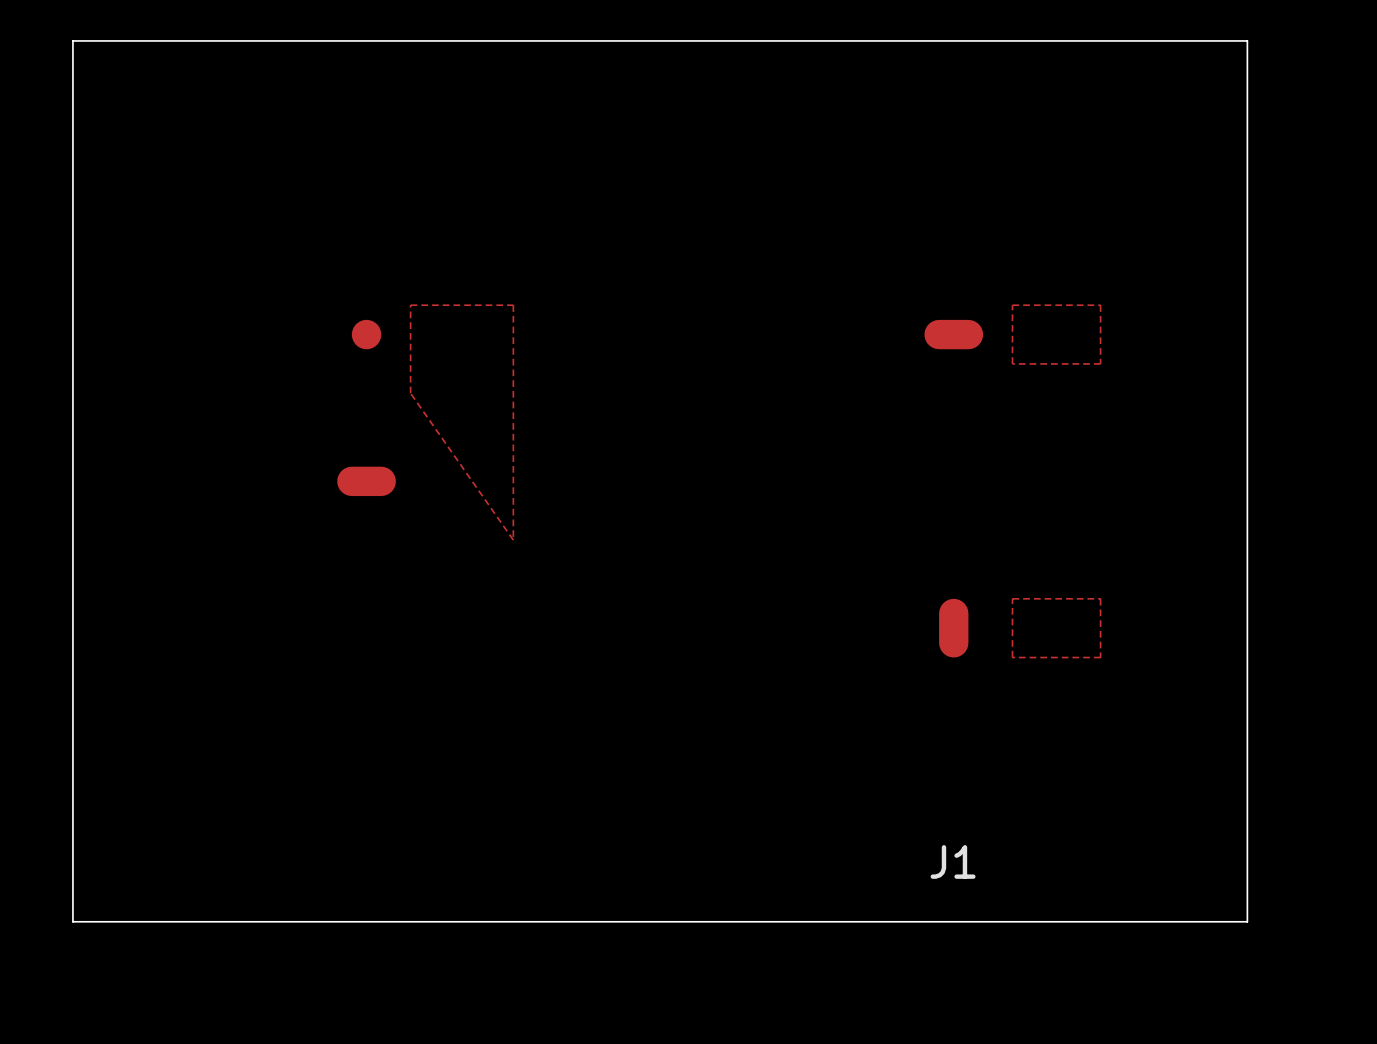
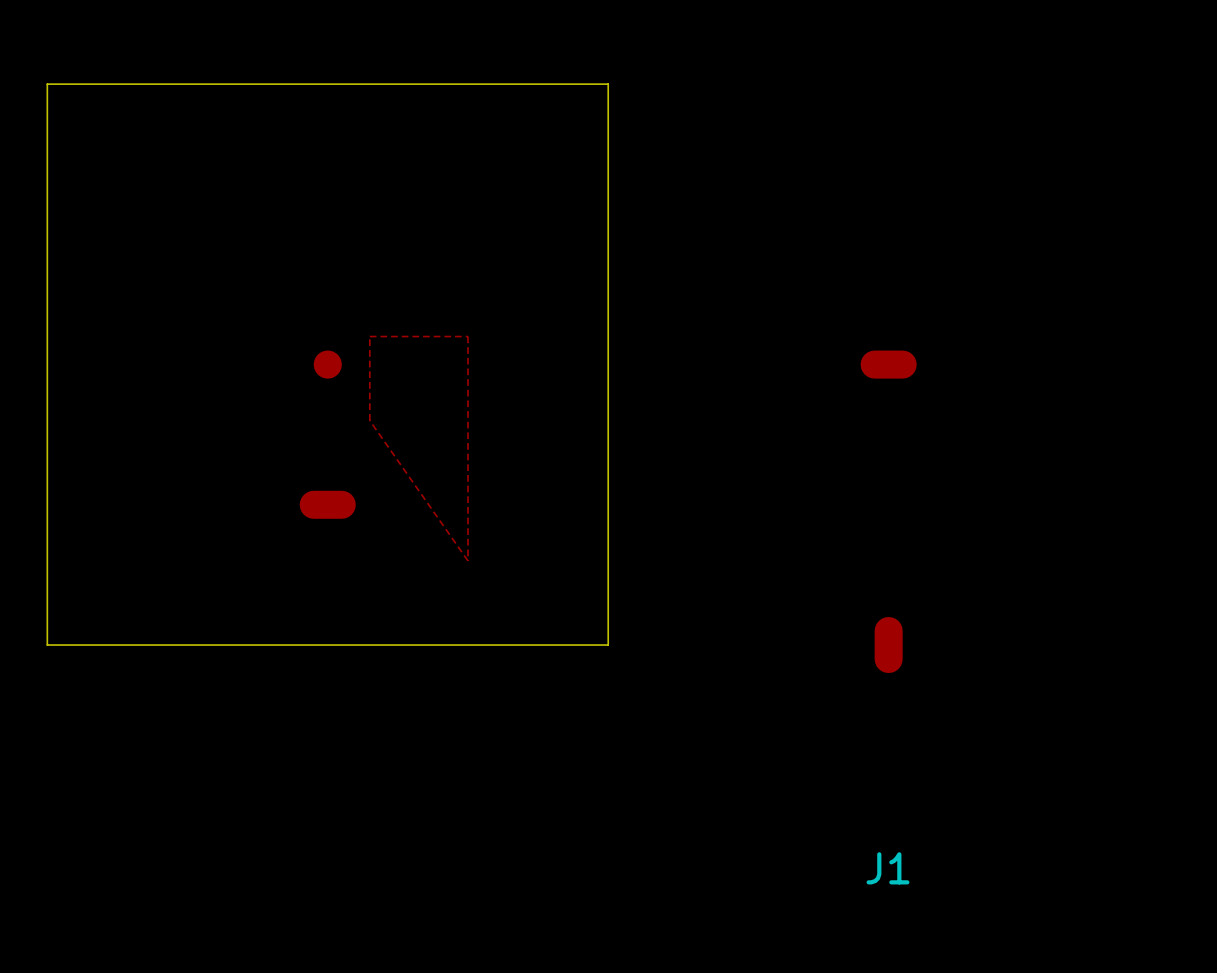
board edge: (660, 40) (1247, 40) (1247, 921) (72, 921) (72, 628) -> (608, 84) (608, 645) (47, 645)
top zone outline: (1012, 305) (1100, 305) (1100, 363) (1012, 363) (1012, 305) -> none
top zone outline: (1012, 598) (1012, 657) (1100, 657) (1100, 598) (1012, 598) -> none

